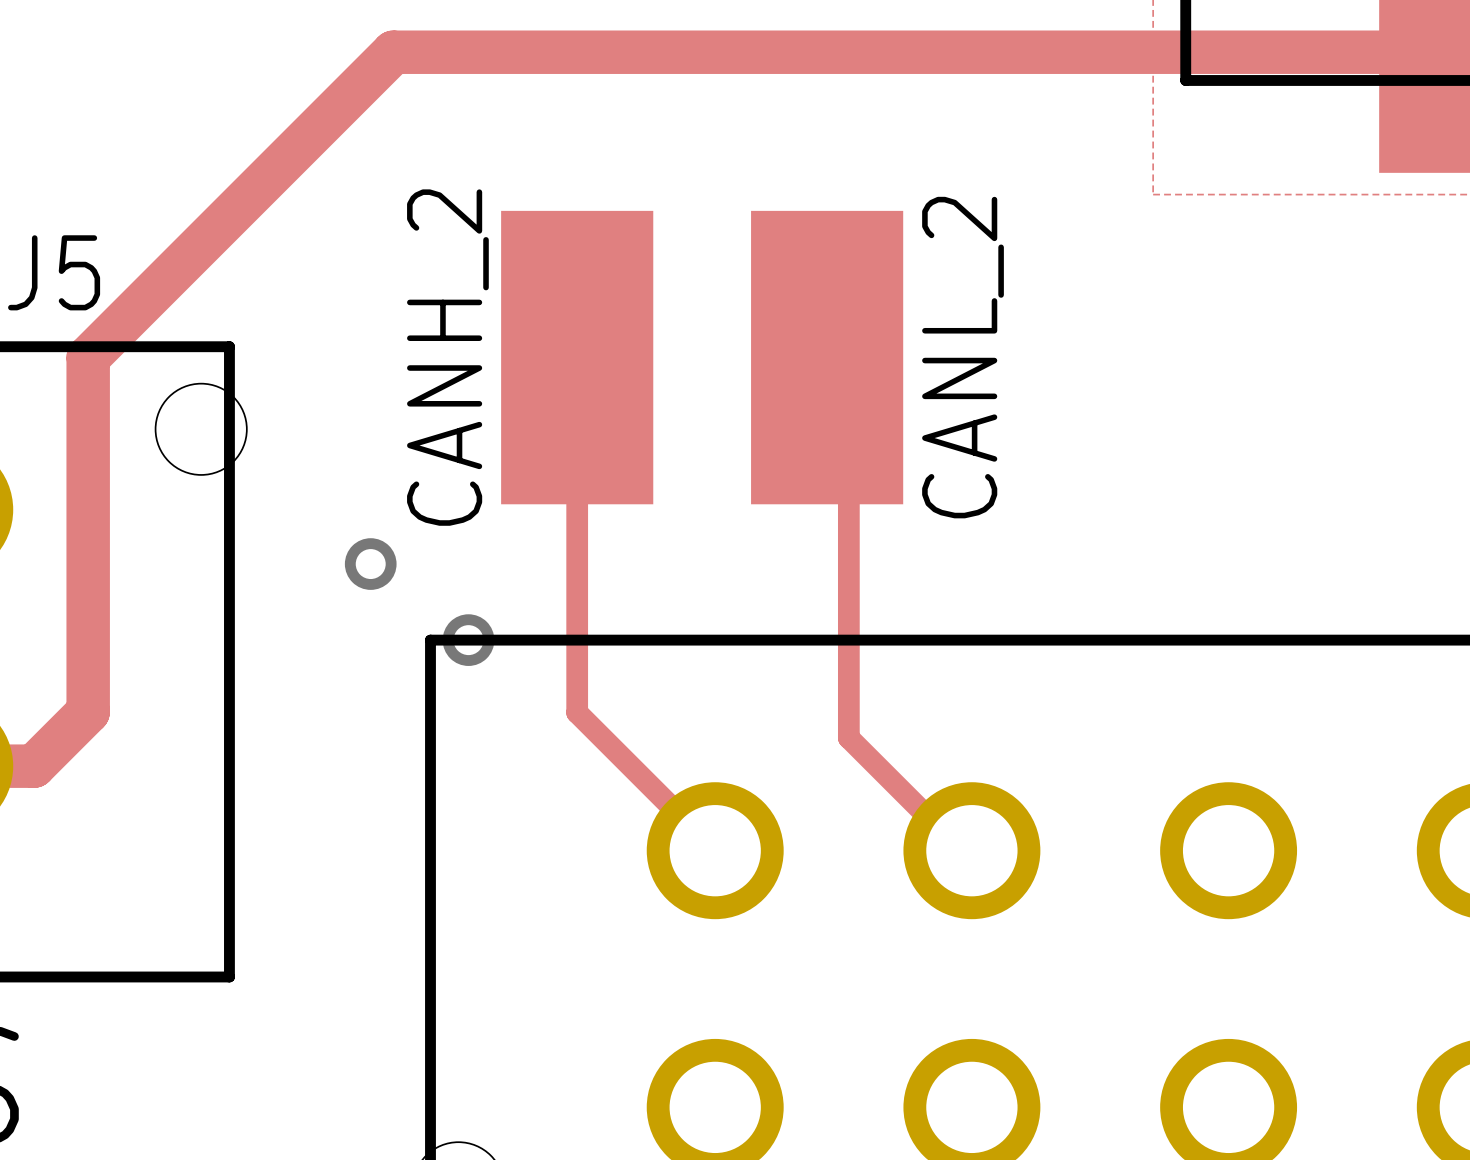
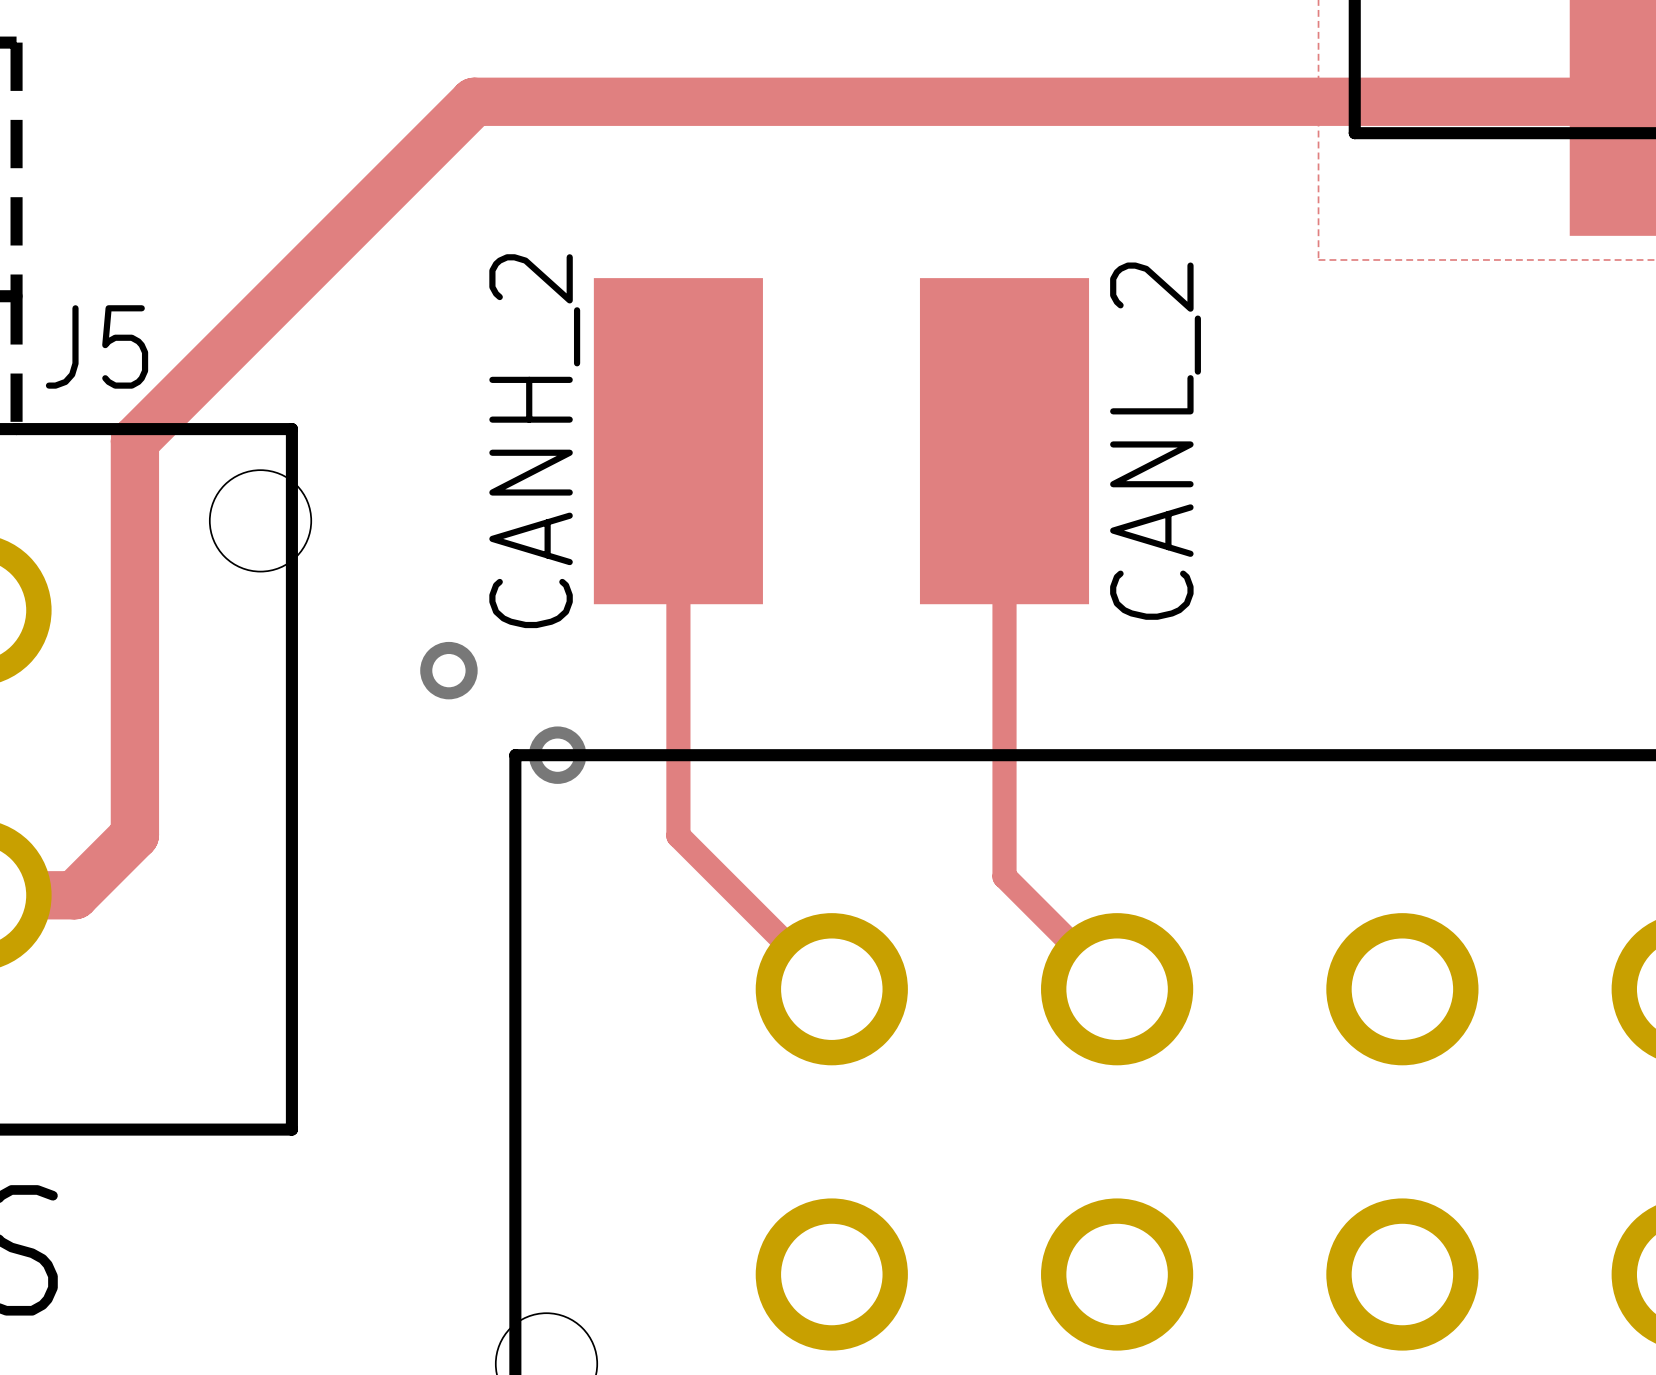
track: (827, 357) (848, 379) (848, 737) (961, 850) (971, 850) -> (1004, 441) (1004, 876) (1117, 989)
CANL_2 position: (827, 357) -> (1004, 441)

